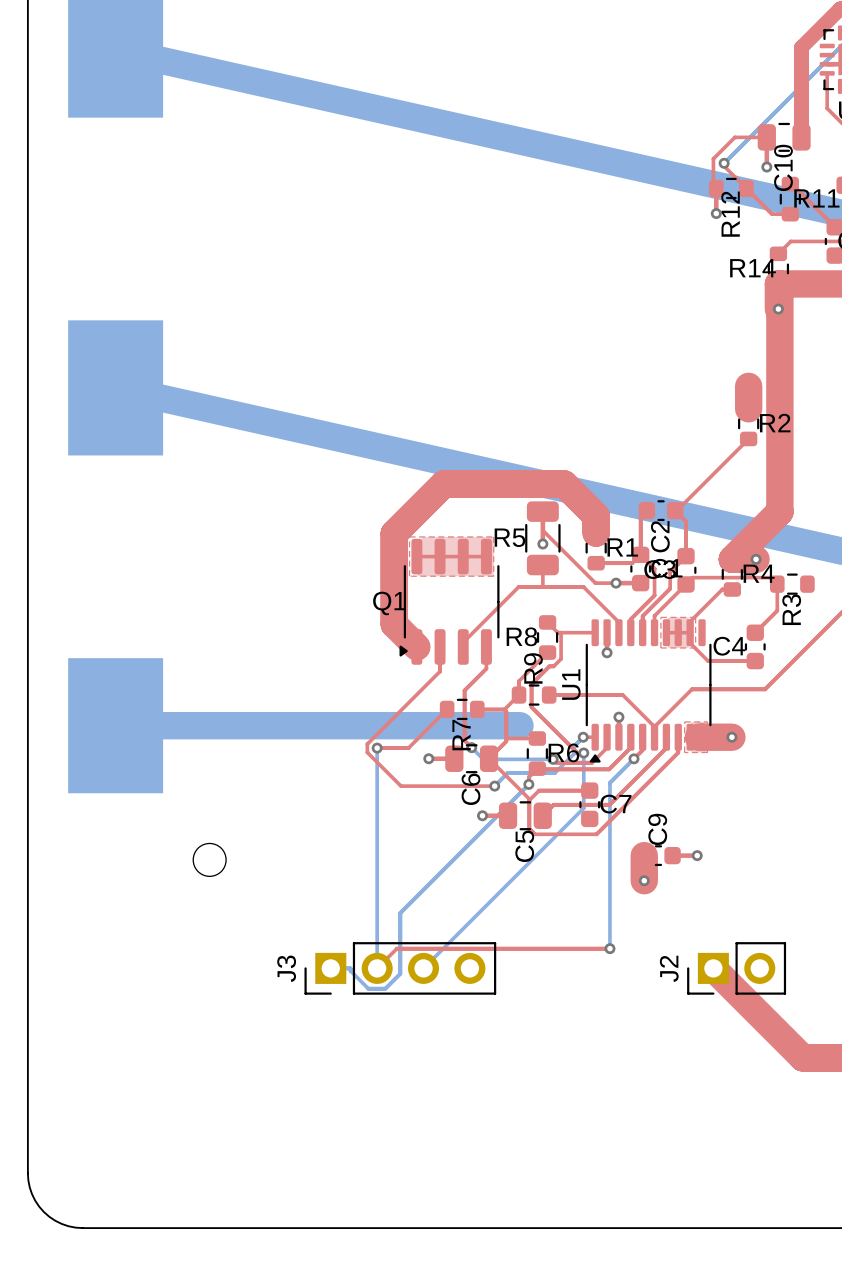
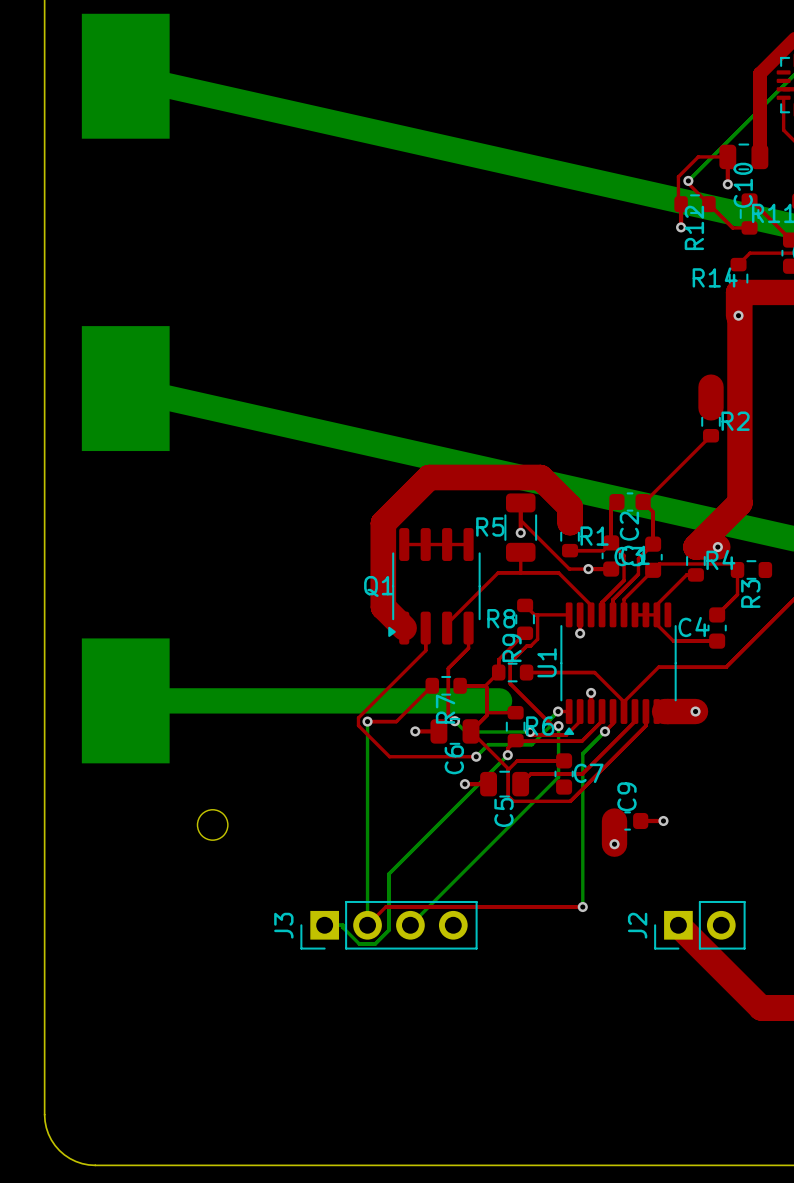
top zone outline: (409, 536) (493, 536) (493, 576) (409, 576) (409, 536) -> none
top zone outline: (660, 617) (695, 617) (695, 647) (660, 647) (660, 617) -> none
top zone outline: (684, 721) (707, 721) (707, 752) (684, 752) (684, 721) -> none

